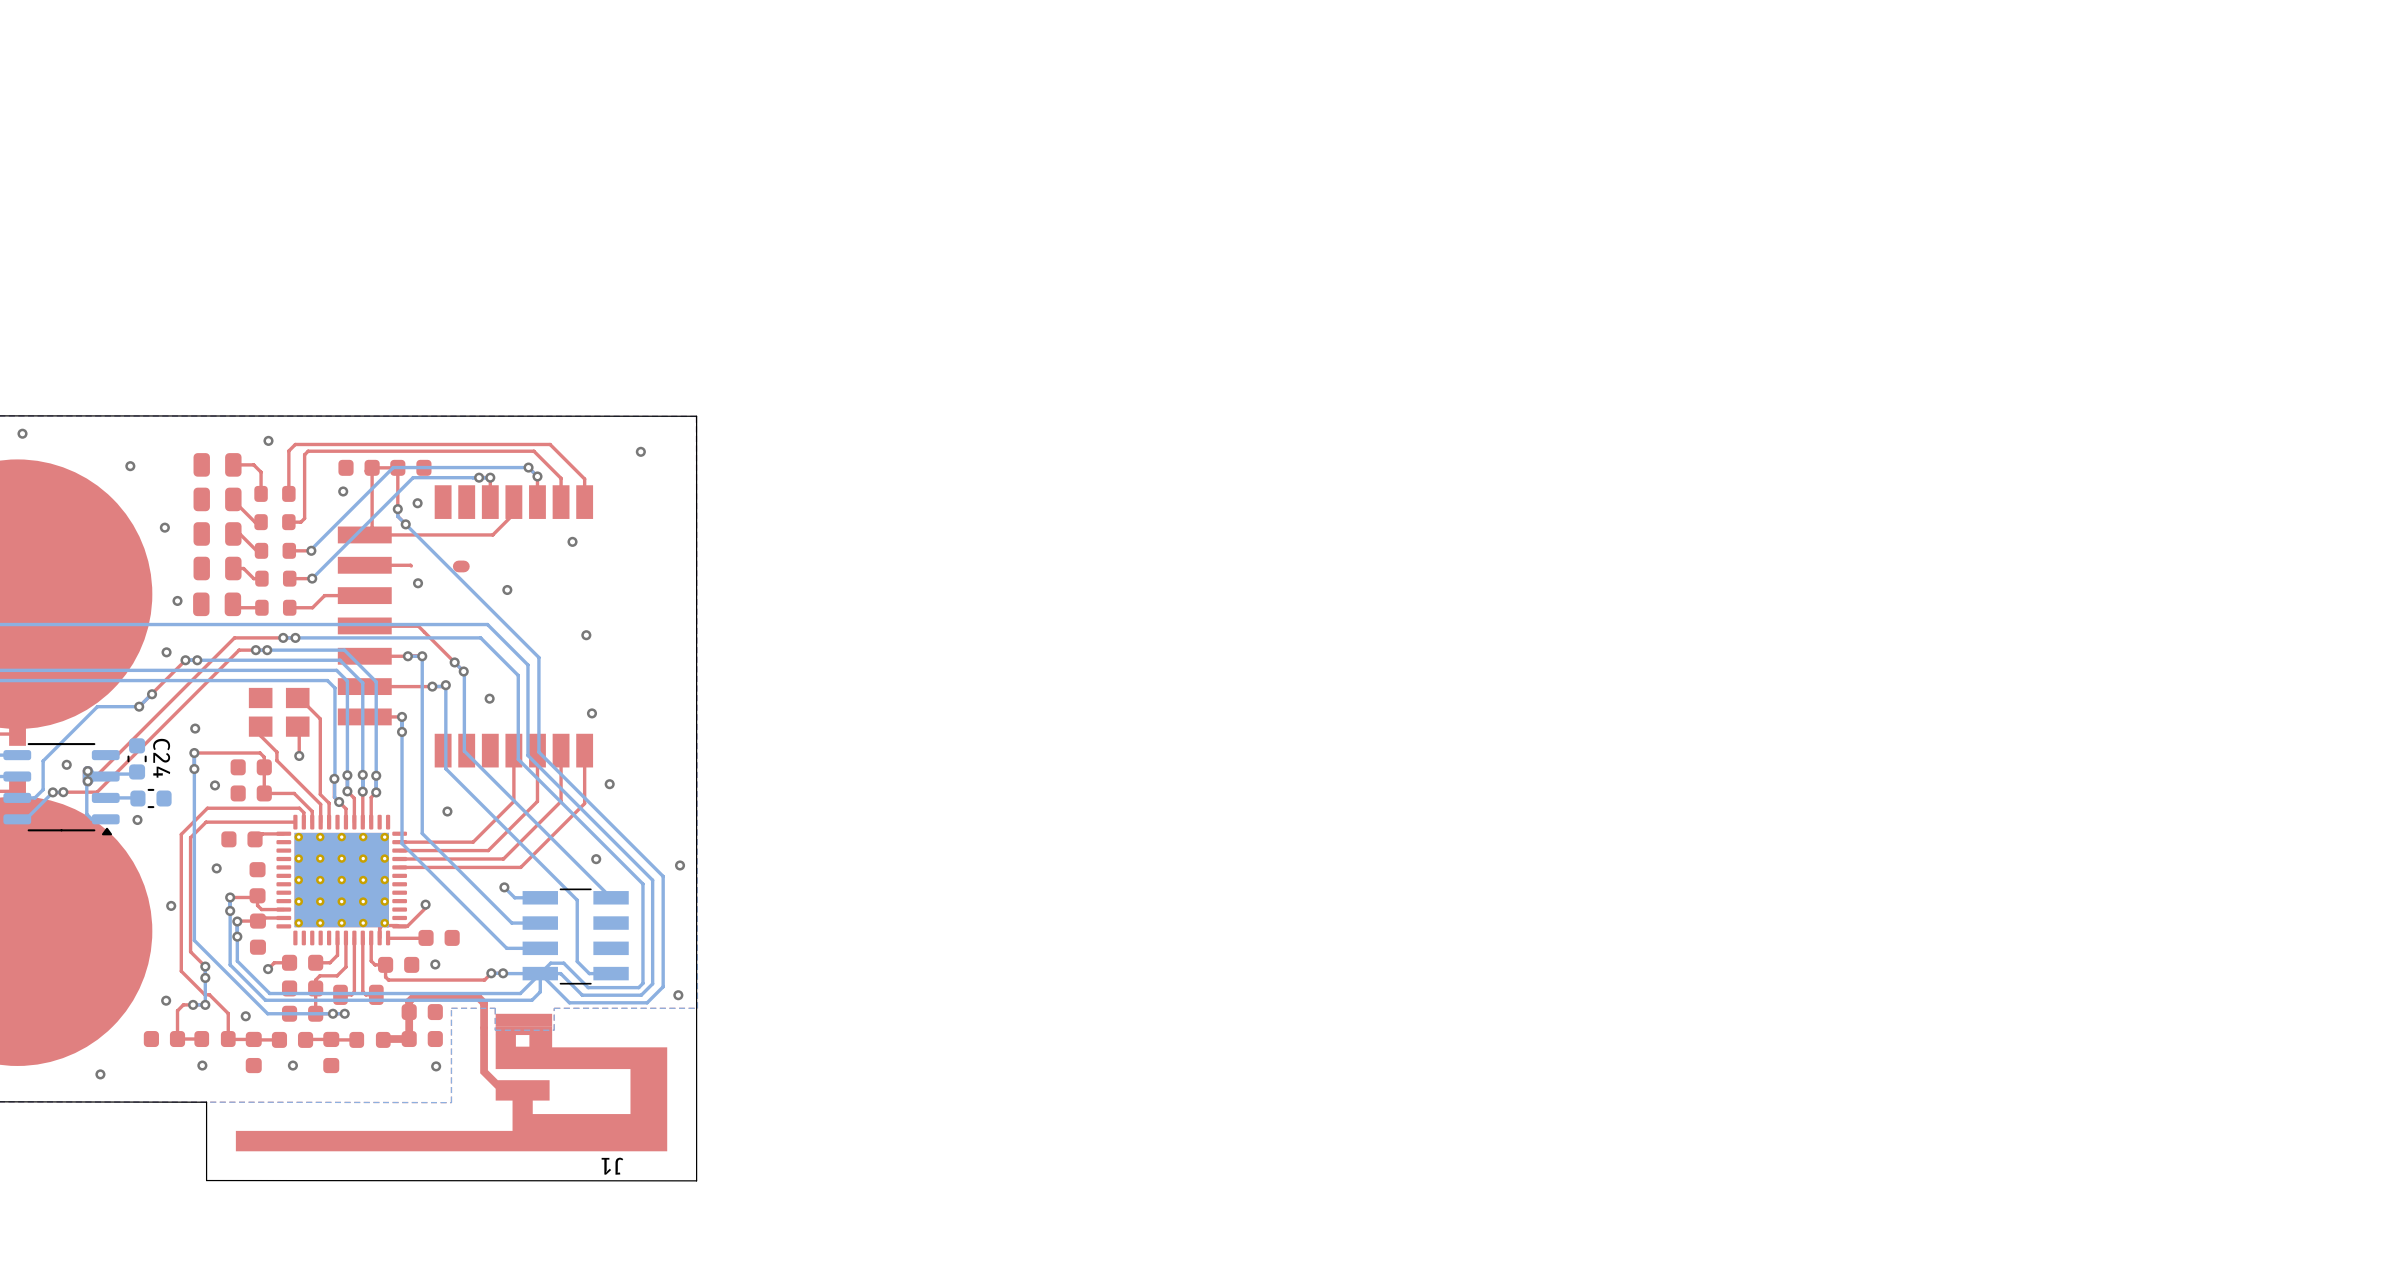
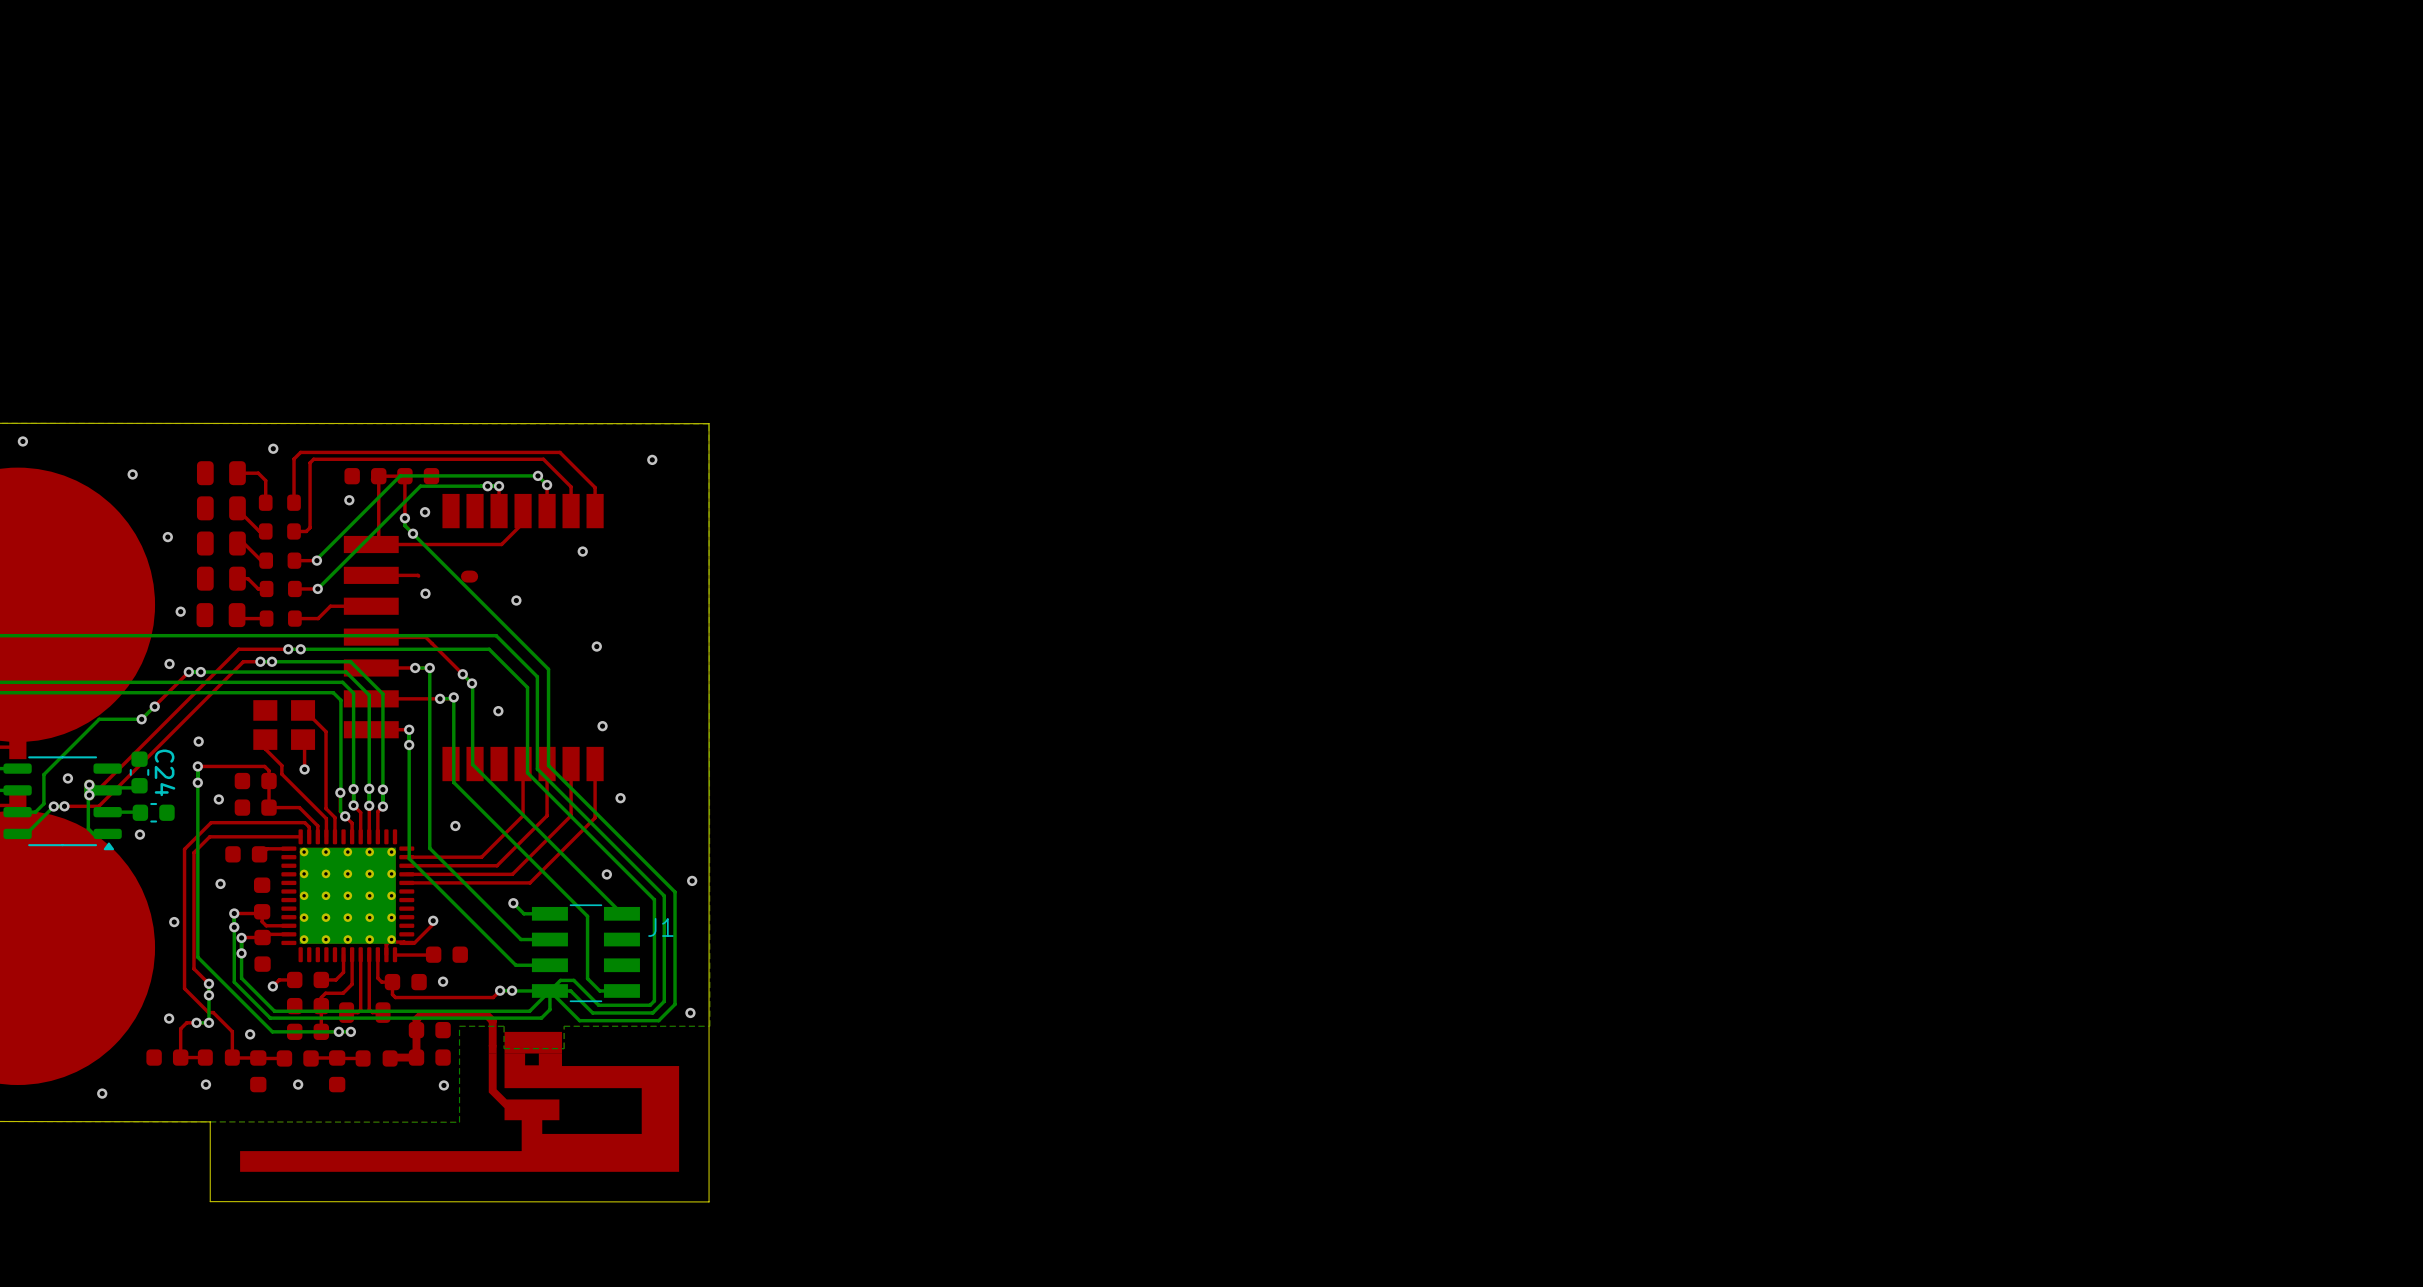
J1 name rotation: 0° (612, 1166) -> 180° (660, 927)
J1 name position: J1 (612, 1166) -> J1 (660, 927)

